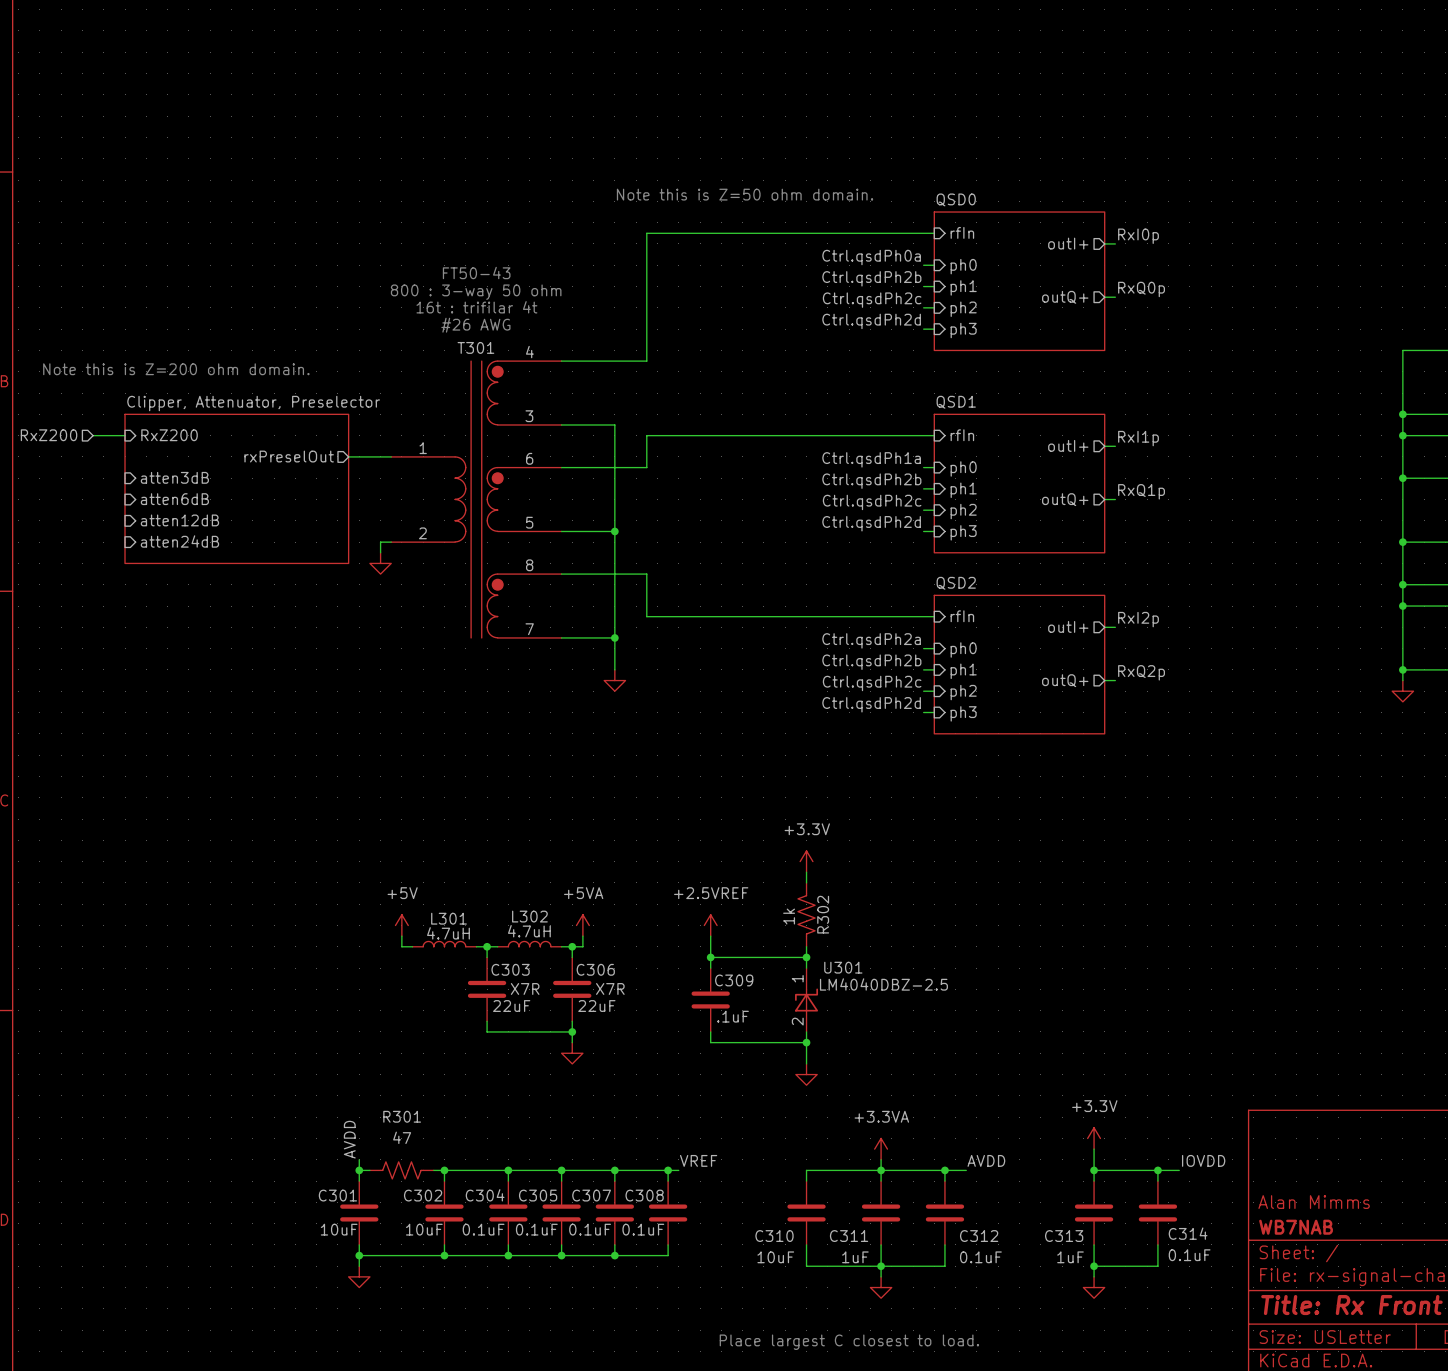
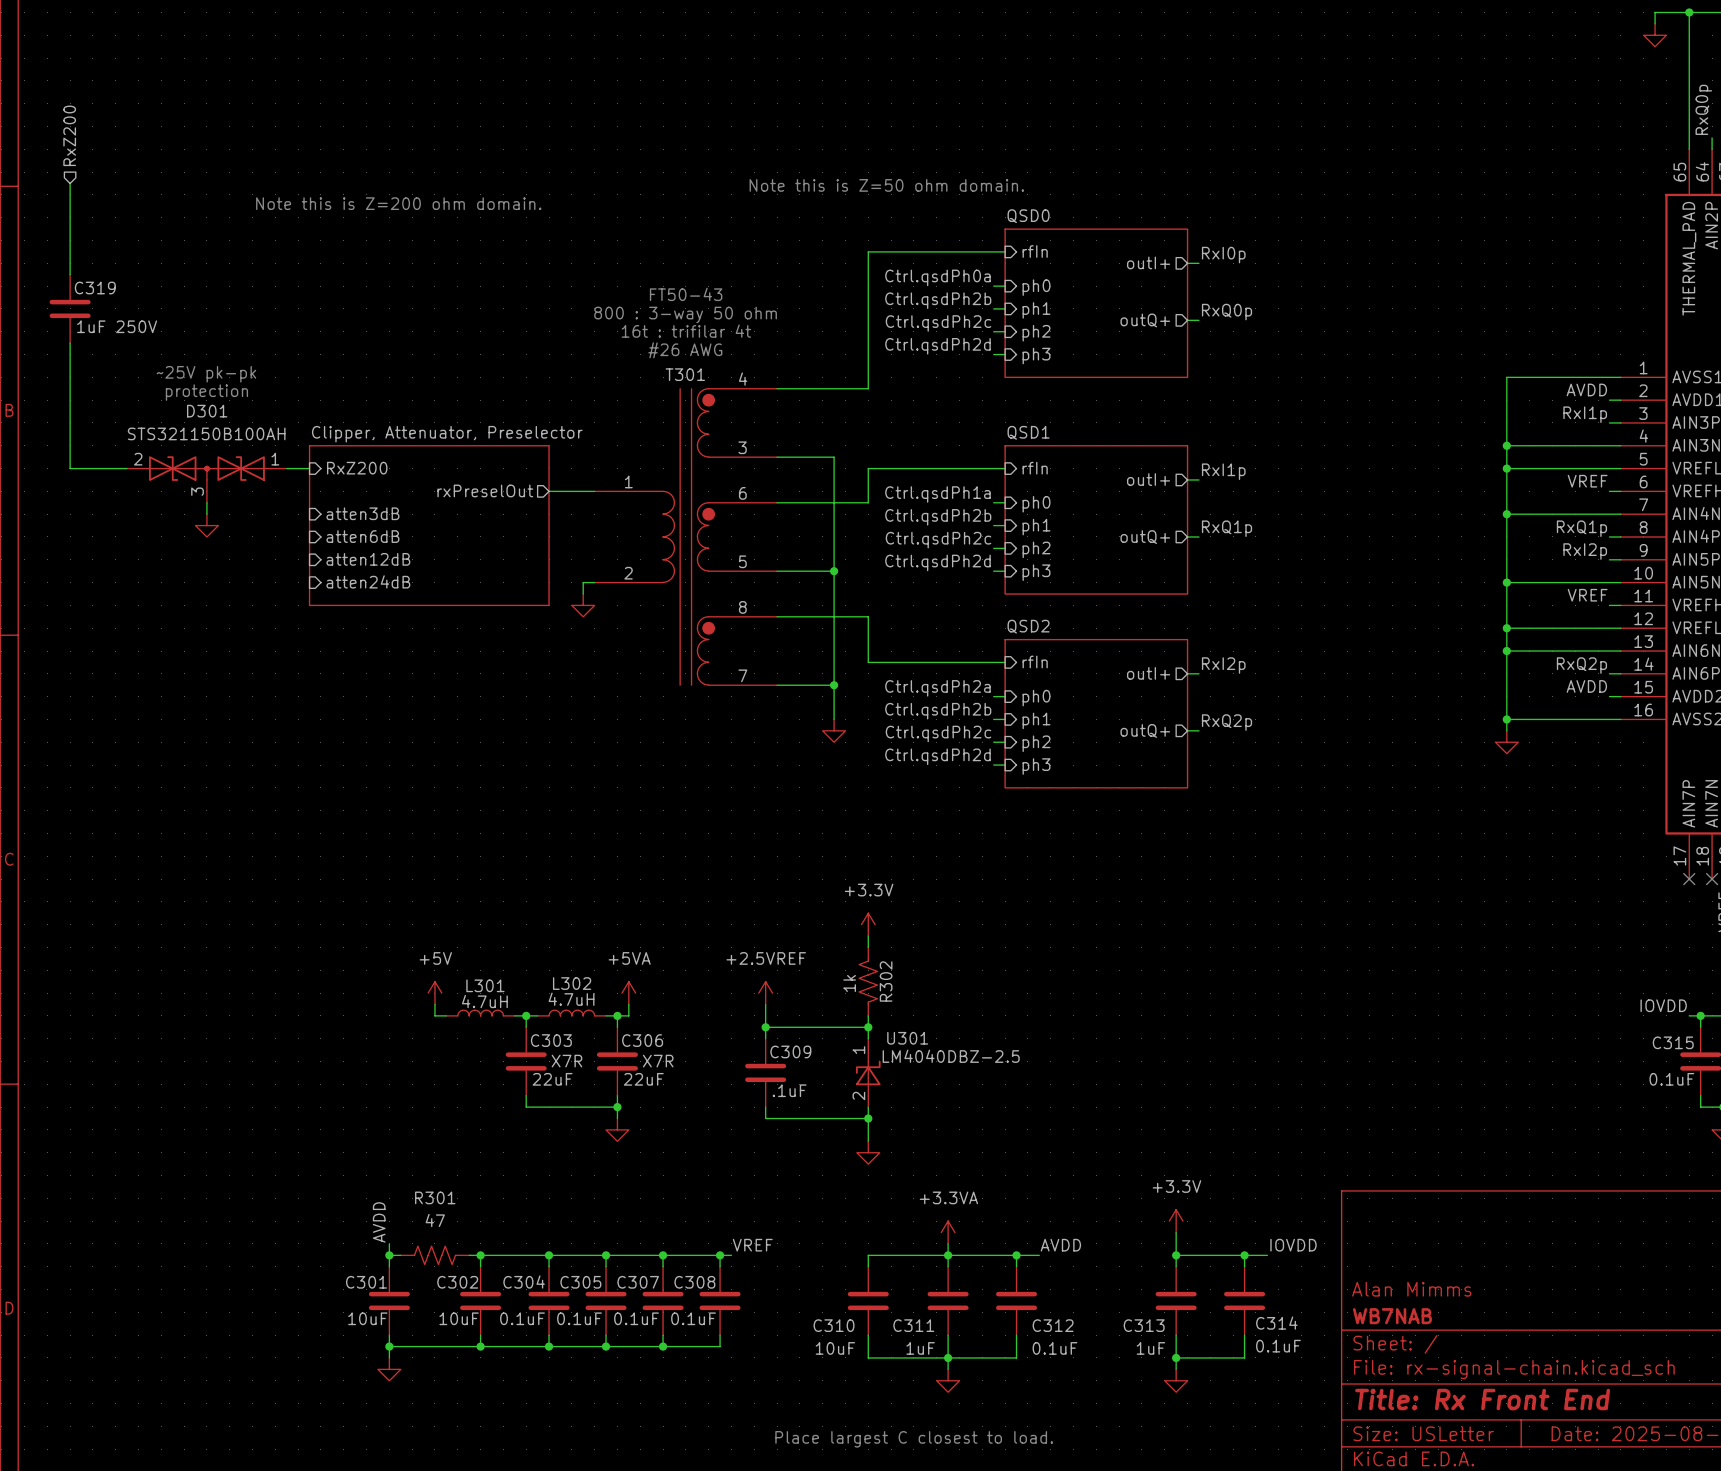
hierarchical label: none -> RxZ200 (69, 135)
wire: none -> (70, 183) (70, 274)
text: none -> Note this is Z=200 ohm domain. (398, 203)
text position: Note this is Z=50 ohm domain. (745, 194) -> Note this is Z=50 ohm domain. (886, 185)
wire: (806, 233) (646, 233) (646, 361) (561, 361) -> (868, 251) (868, 388) (777, 388)
text position: FT50-43 (476, 273) -> FT50-43 (686, 294)
C319: none -> 1uF 250V (70, 308)
text position: 800 : 3-way 50 ohm (476, 292) -> 800 : 3-way 50 ohm (685, 314)
text position: 16t : trifilar 4t (476, 307) -> 16t : trifilar 4t (686, 331)
wire: none -> (70, 343) (70, 468) (104, 468)
text position: #26 AWG (475, 325) -> #26 AWG (685, 350)
text: none -> ~25V pk-pk (206, 374)
text: none -> protection (206, 392)
text: Note this is Z=200 ohm domain. (176, 369) -> none
wire: (561, 424) (614, 424) (614, 669) -> (777, 457) (834, 457) (834, 719)
hierarchical label: RxZ200 (49, 435) -> none
sheet pin position: RxZ200 (169, 435) -> RxZ200 (357, 468)
wire: none -> (286, 468) (309, 468)
wire: (806, 435) (646, 435) (646, 467) (561, 467) -> (868, 468) (868, 502) (777, 502)
D301: none -> STS321150B100AH (206, 479)
sheet pin position: rxPreselOut (289, 456) -> rxPreselOut (485, 490)
wire: (348, 456) (391, 456) -> (549, 491) (594, 491)
wire: none -> (206, 502) (206, 514)
sheet pin position: atten3dB (174, 477) -> atten3dB (362, 513)
power symbol: none -> (206, 525)
sheet Clipper, Attenuator, Preselector position: (236, 488) -> (429, 525)
sheet pin position: atten6dB (174, 499) -> atten6dB (362, 536)
T301 position: (476, 499) -> (685, 536)
sheet pin position: atten12dB (179, 520) -> atten12dB (368, 559)
wire: (561, 531) (614, 531) -> (777, 571) (834, 571)
junction: (614, 531) -> none
junction: none -> (834, 571)
sheet pin position: atten24dB (179, 541) -> atten24dB (368, 581)
wire: (391, 542) (380, 542) (380, 552) -> (594, 582) (583, 582) (583, 594)
power symbol: (380, 563) -> none
power symbol: none -> (583, 605)
wire: (561, 574) (646, 574) (646, 616) (806, 616) -> (777, 616) (868, 616) (868, 662)
wire: (561, 637) (614, 637) -> (777, 685) (834, 685)
junction: (614, 637) -> none
junction: none -> (834, 685)
power symbol: (614, 680) -> none
power symbol: none -> (834, 730)

